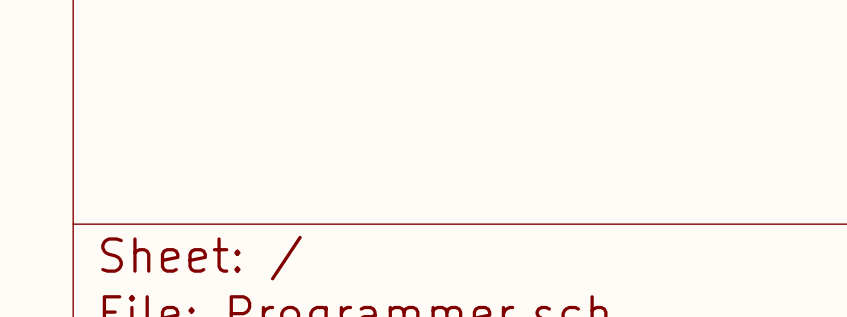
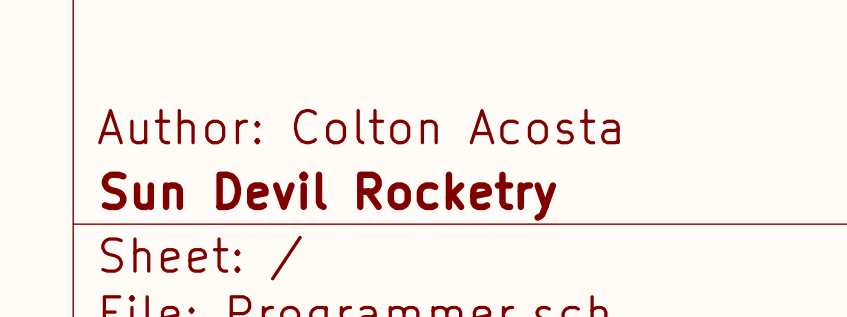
title block: none -> Author: Colton Acosta (358, 126)
title block: none -> Sun Devil Rocketry (328, 196)

